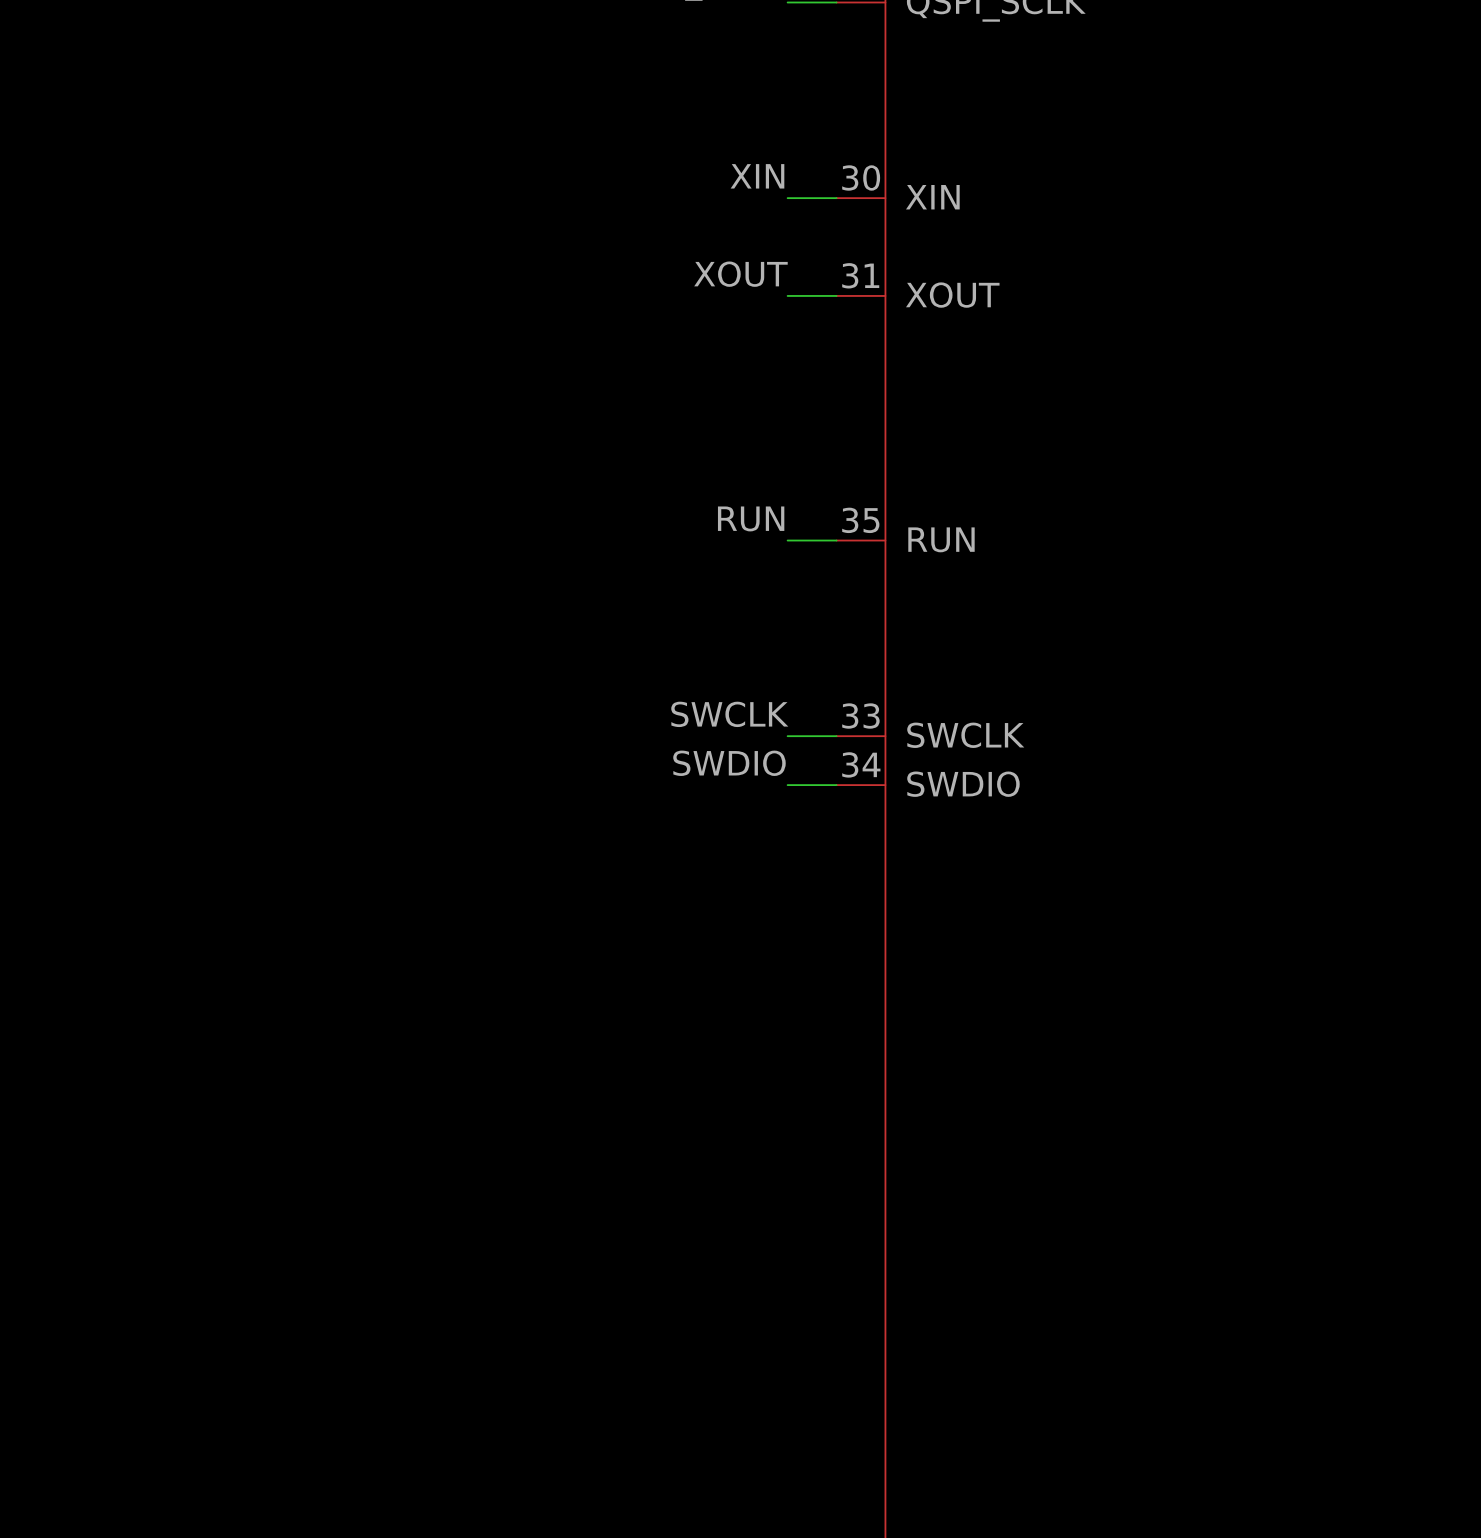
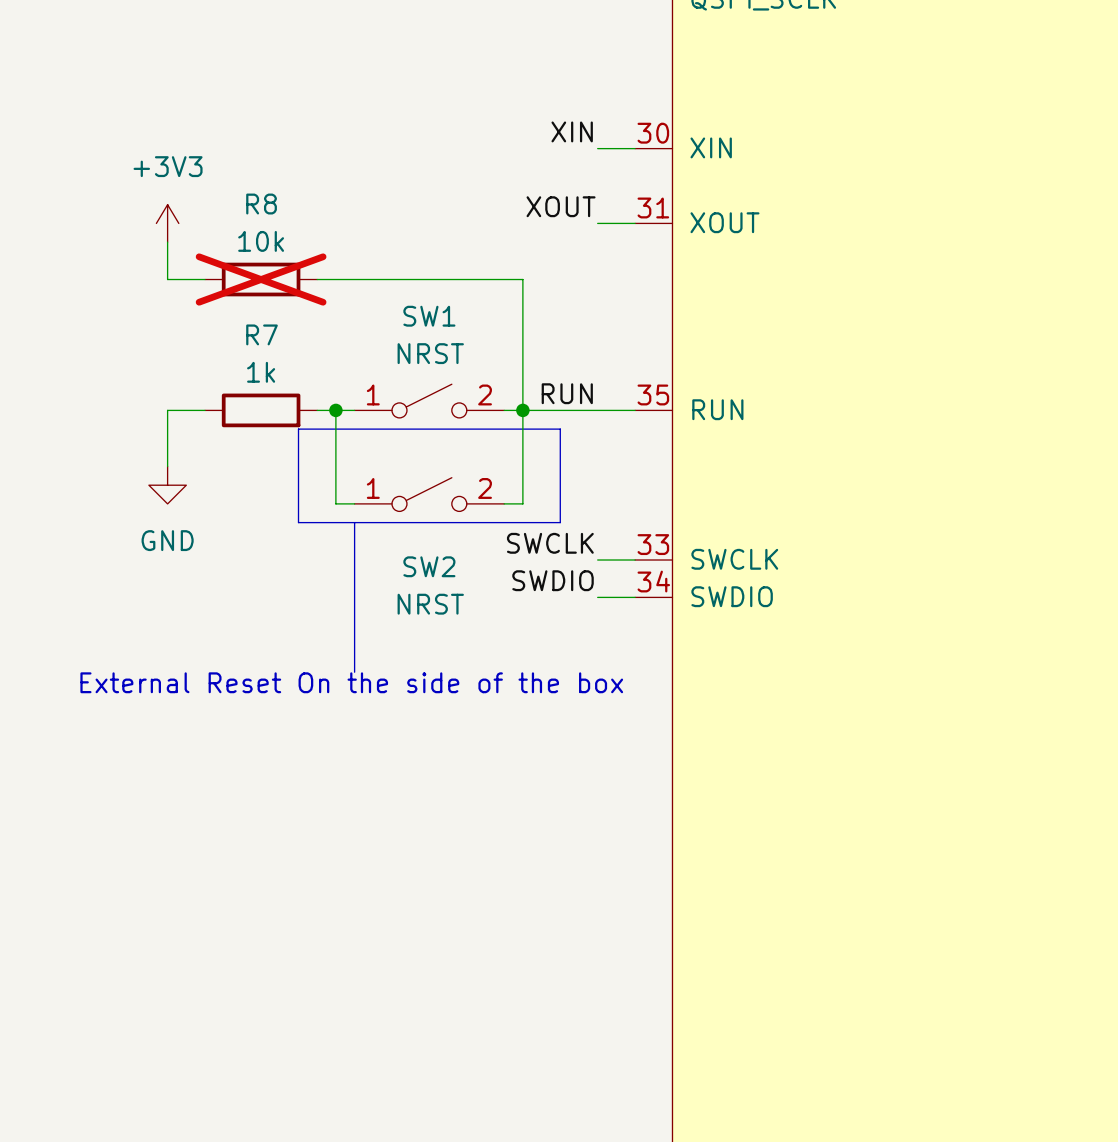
power symbol: none -> +3V3 (167, 223)
wire: none -> (167, 242) (167, 279) (205, 279)
R8: none -> 10k (261, 279)
wire: none -> (317, 279) (522, 279) (522, 503) (504, 503)
SW1: none -> NRST (429, 401)
wire: none -> (205, 410) (167, 410) (167, 466)
R7: none -> 1k (261, 410)
wire: none -> (317, 410) (354, 410)
wire: none -> (335, 410) (335, 503) (354, 503)
junction: none -> (335, 410)
wire: none -> (504, 410) (597, 410)
junction: none -> (522, 410)
line: none -> (298, 429) (560, 429) (560, 522) (298, 522) (298, 429)
power symbol: none -> GND (167, 485)
SW2: none -> NRST (429, 494)
line: none -> (354, 522) (354, 672)
text: none -> External Reset On the side of the box (351, 682)

